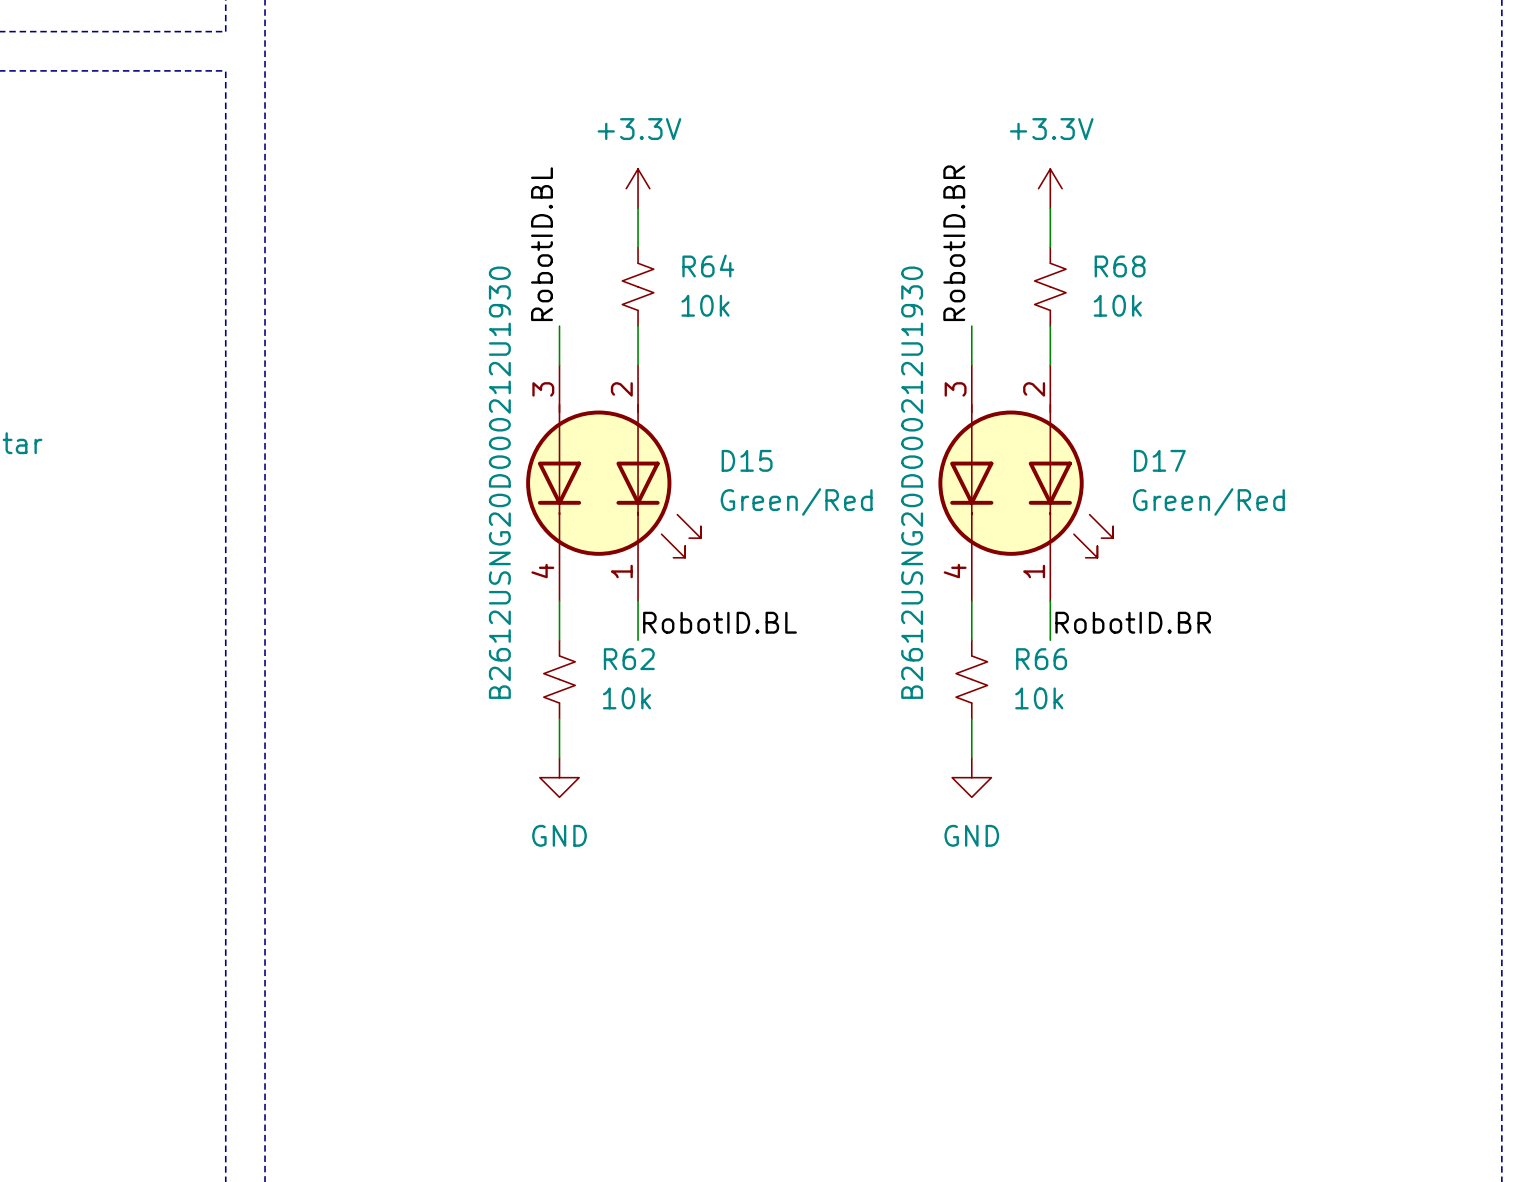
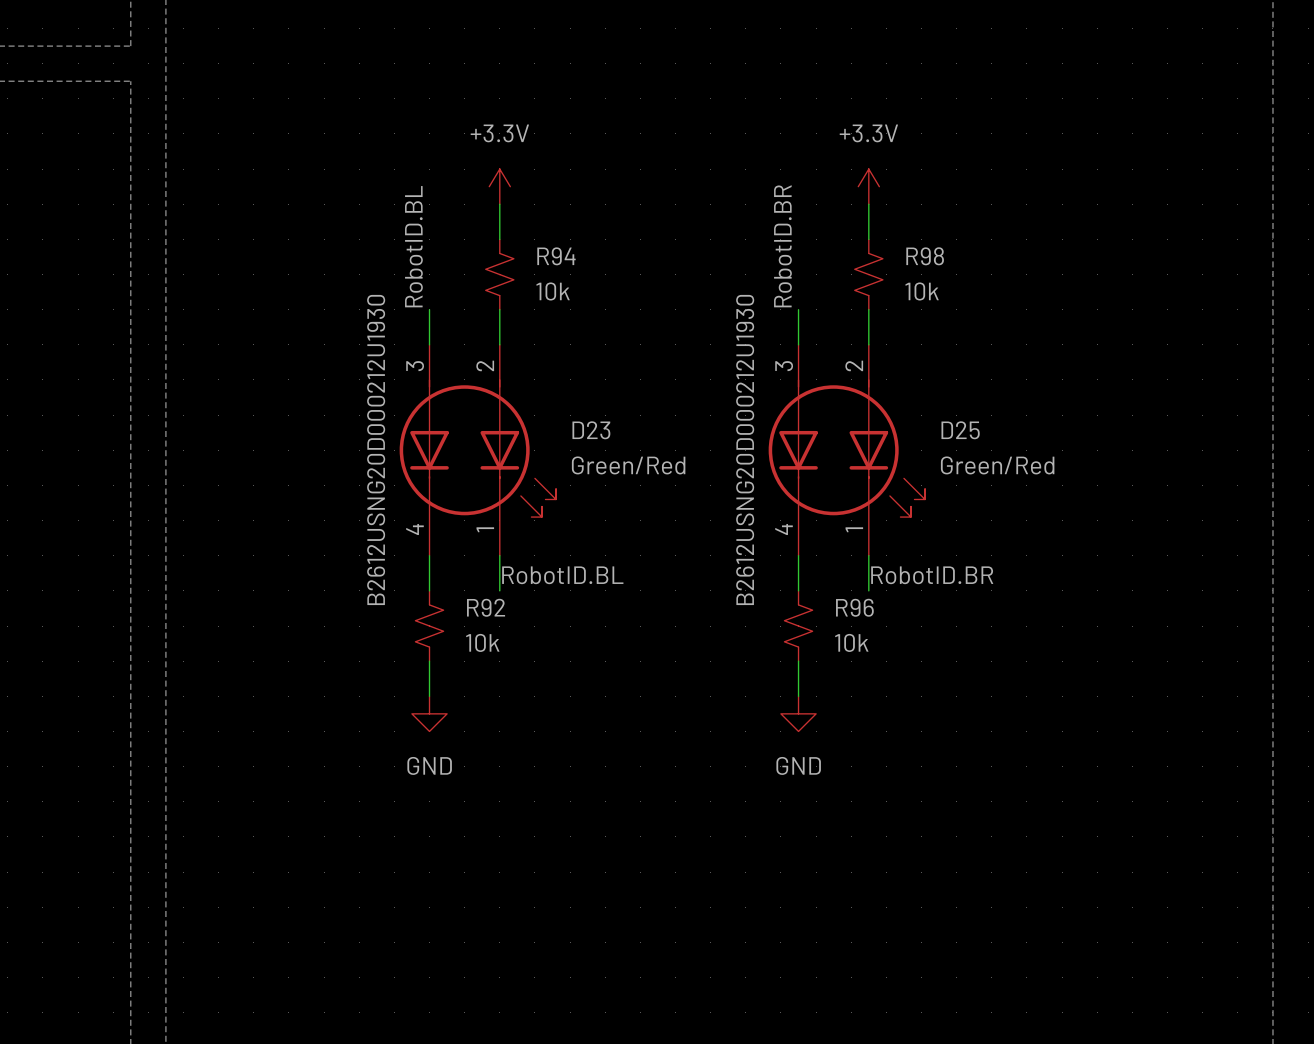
R64 name: R64 (708, 266) -> R94 (556, 256)
R68 name: R68 (1120, 266) -> R98 (925, 256)
D15 name: D15 (747, 460) -> D23 (591, 430)
D17 name: D17 (1159, 460) -> D25 (960, 430)
R62 name: R62 (629, 659) -> R92 (486, 607)
R66 name: R66 (1041, 659) -> R96 (854, 607)

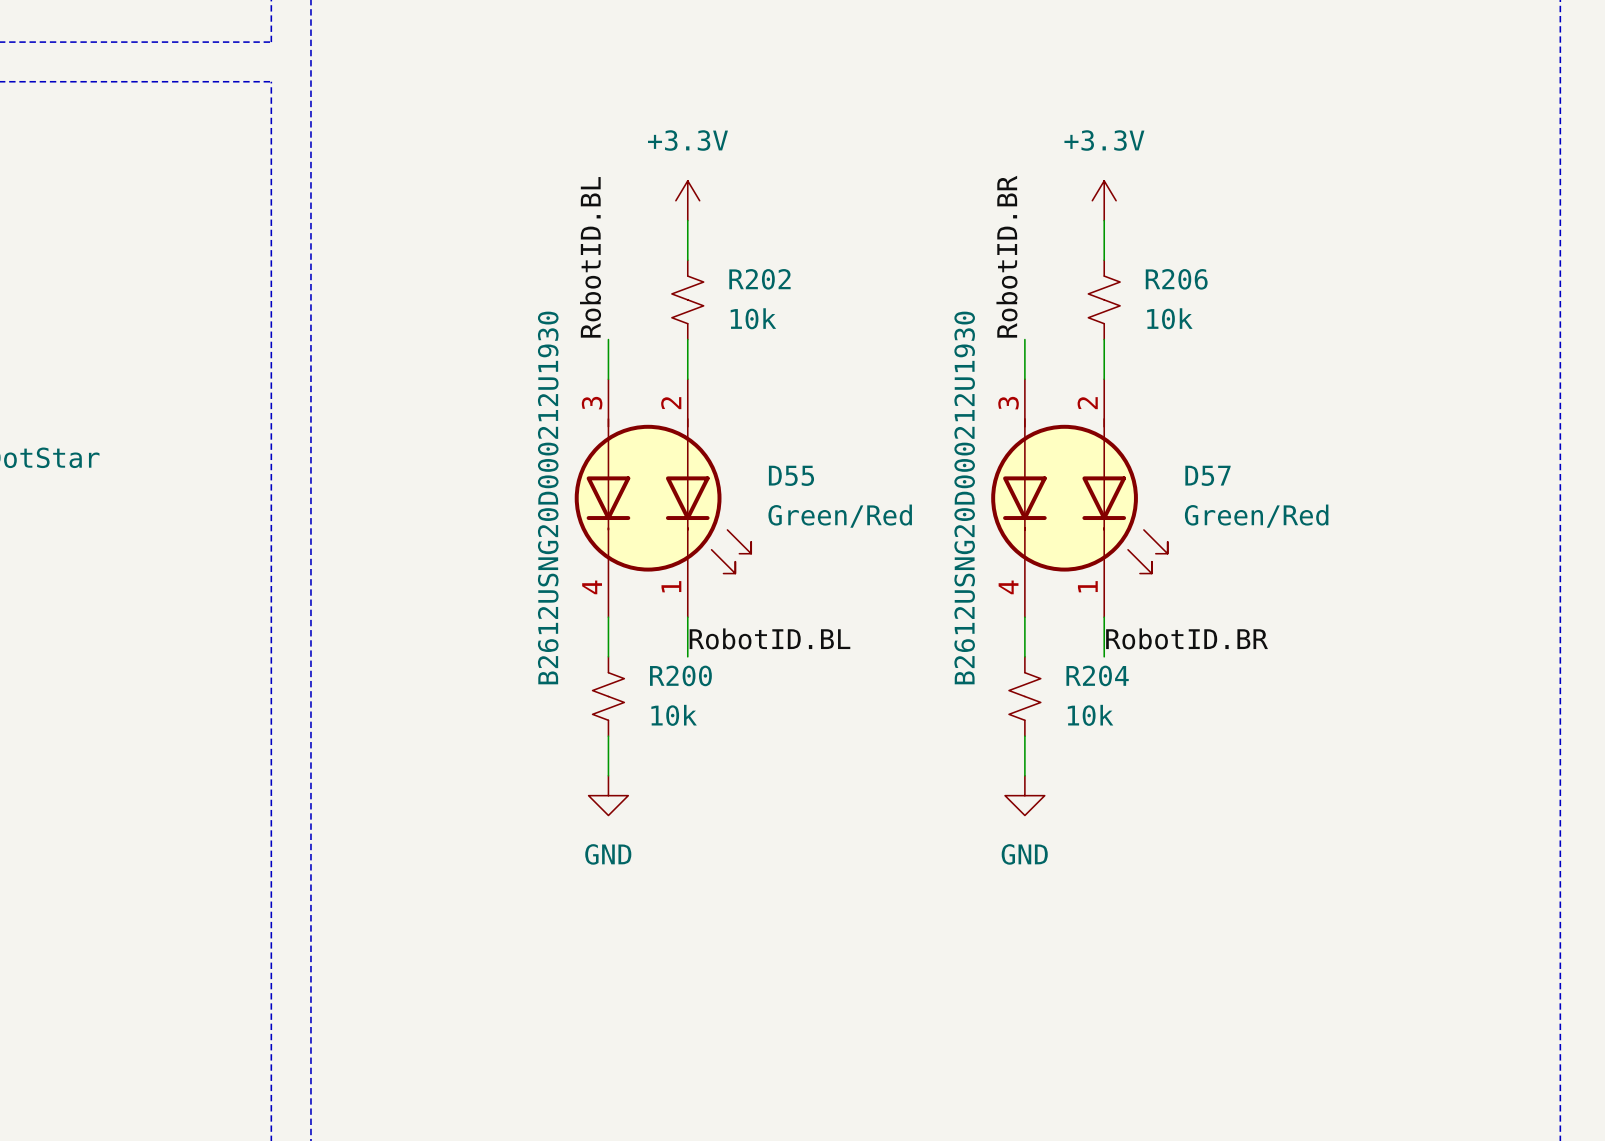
R94 name: R94 (556, 256) -> R202 (759, 279)
R98 name: R98 (925, 256) -> R206 (1176, 279)
D23 name: D23 (591, 430) -> D55 (791, 475)
D25 name: D25 (960, 430) -> D57 (1207, 475)
R92 name: R92 (486, 607) -> R200 (680, 675)
R96 name: R96 (854, 607) -> R204 (1097, 675)

